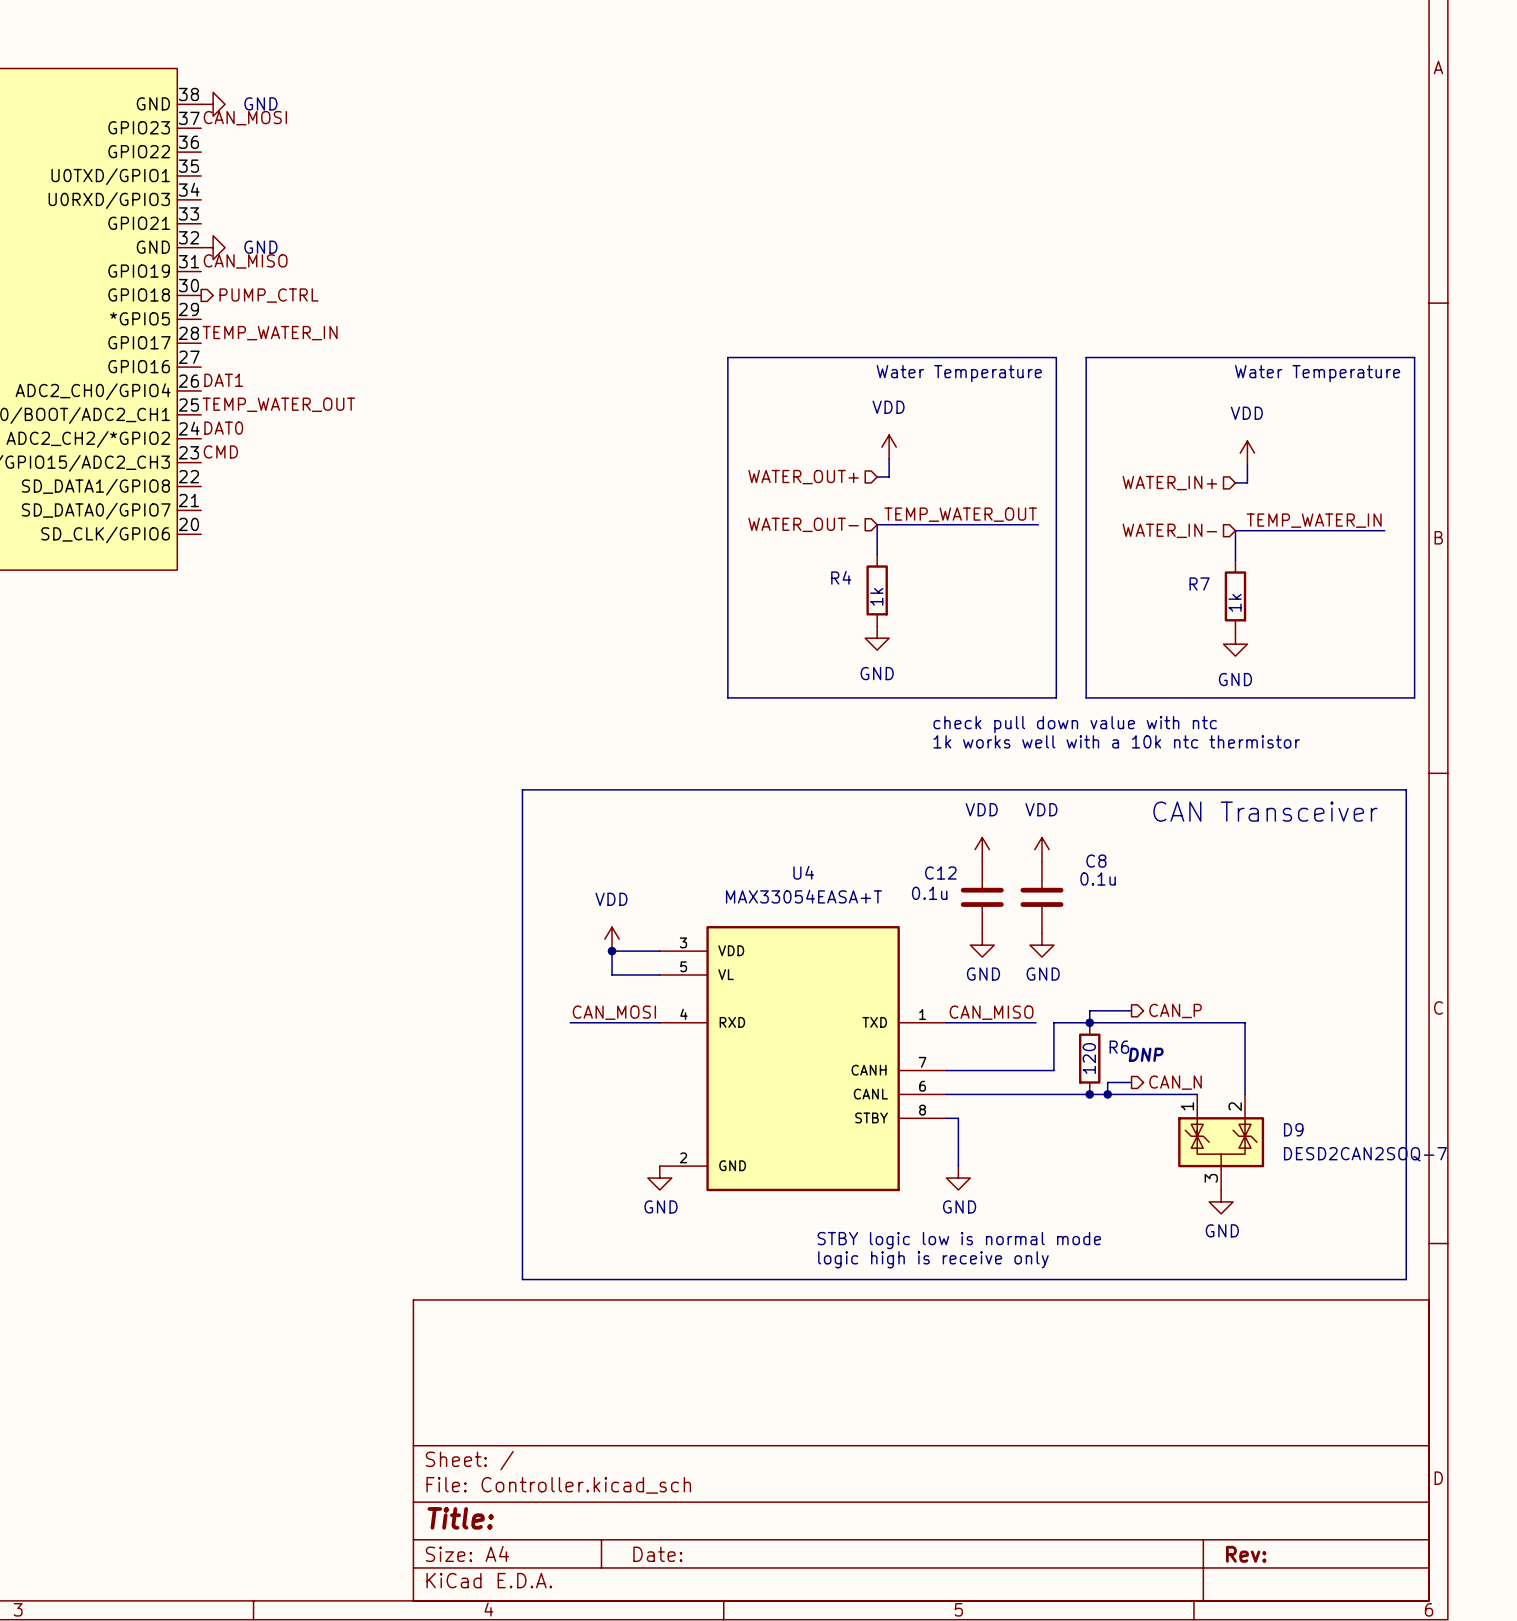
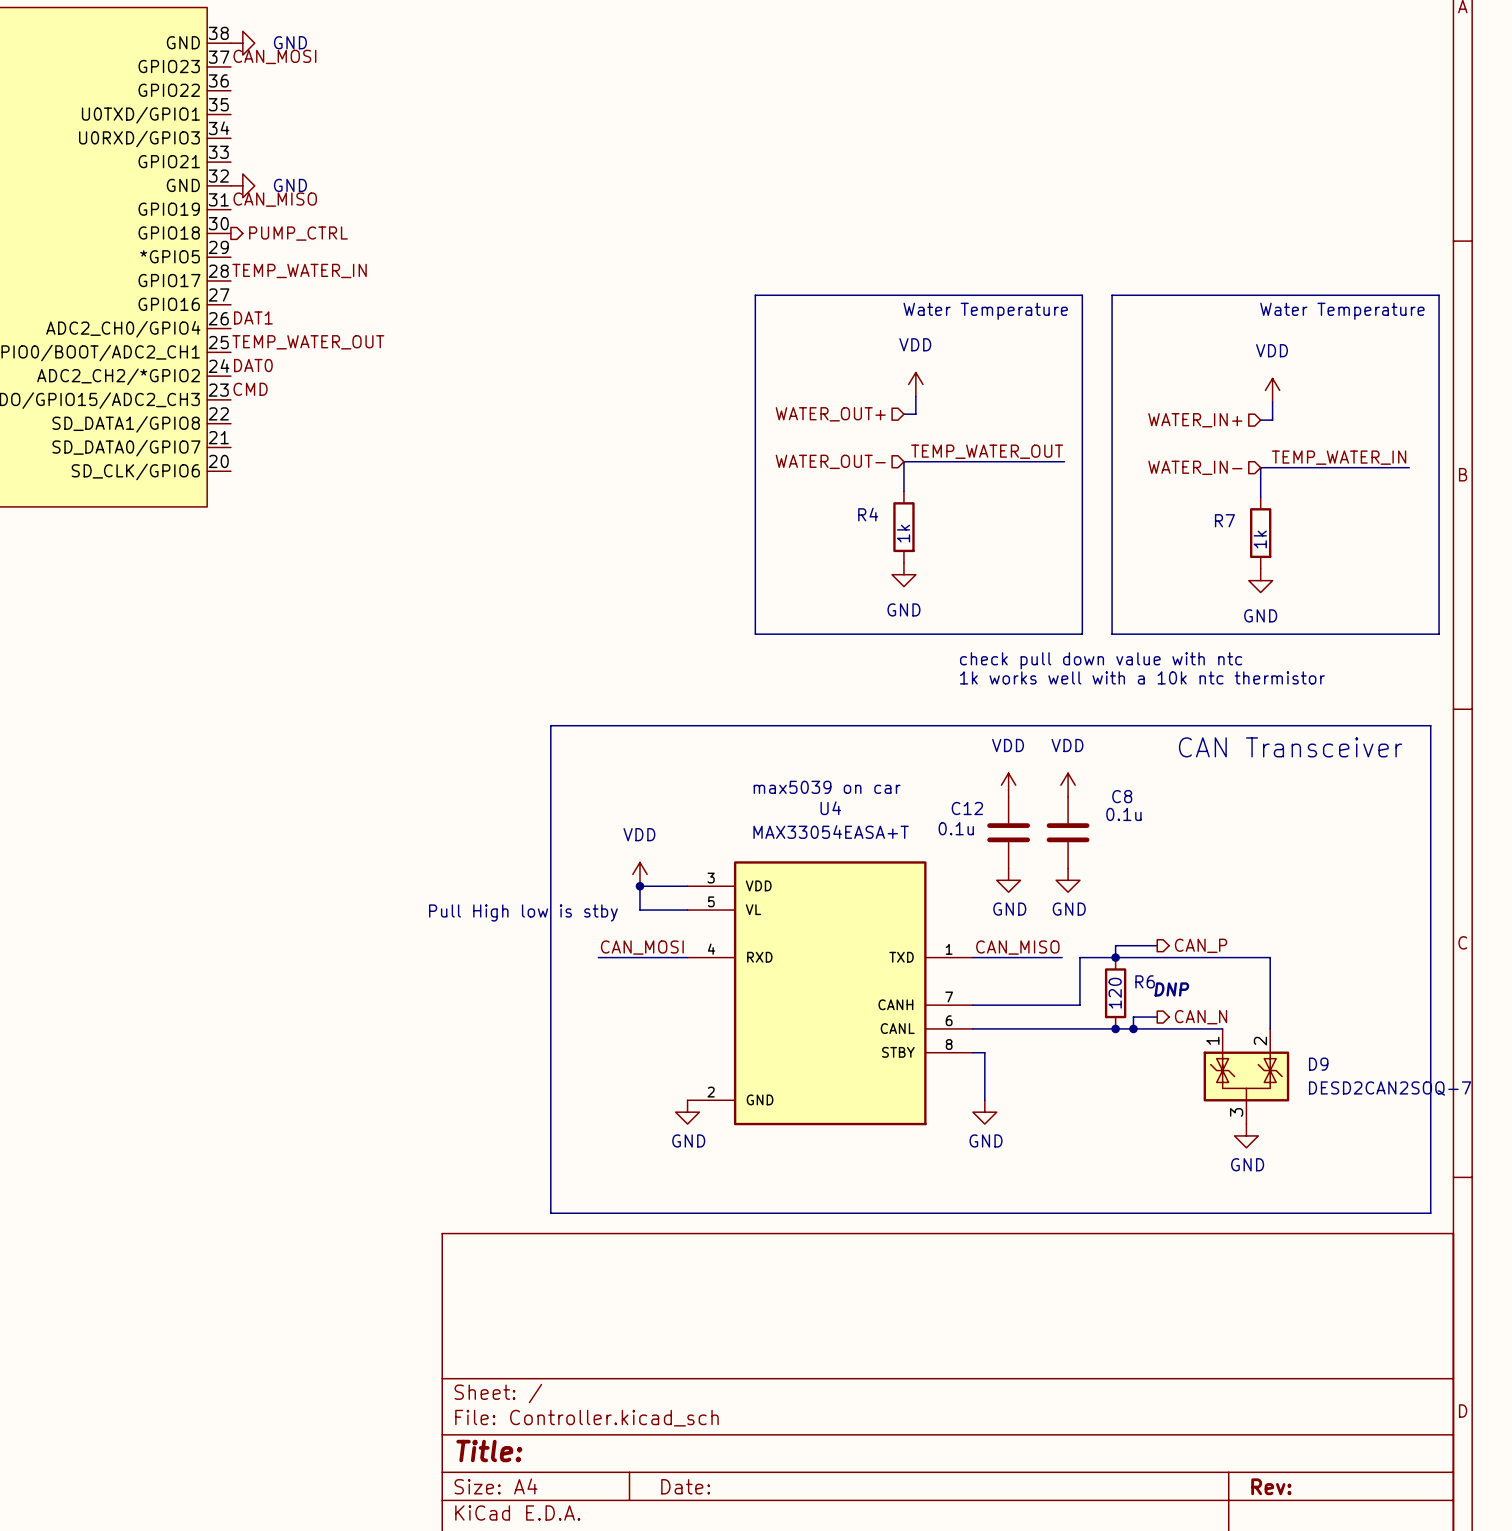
text: none -> max5039 on car (827, 787)
text: none -> Pull High low is stby (523, 912)
text: STBY logic low is normal mode (959, 1240) -> none
text: logic high is receive only (933, 1259) -> none

